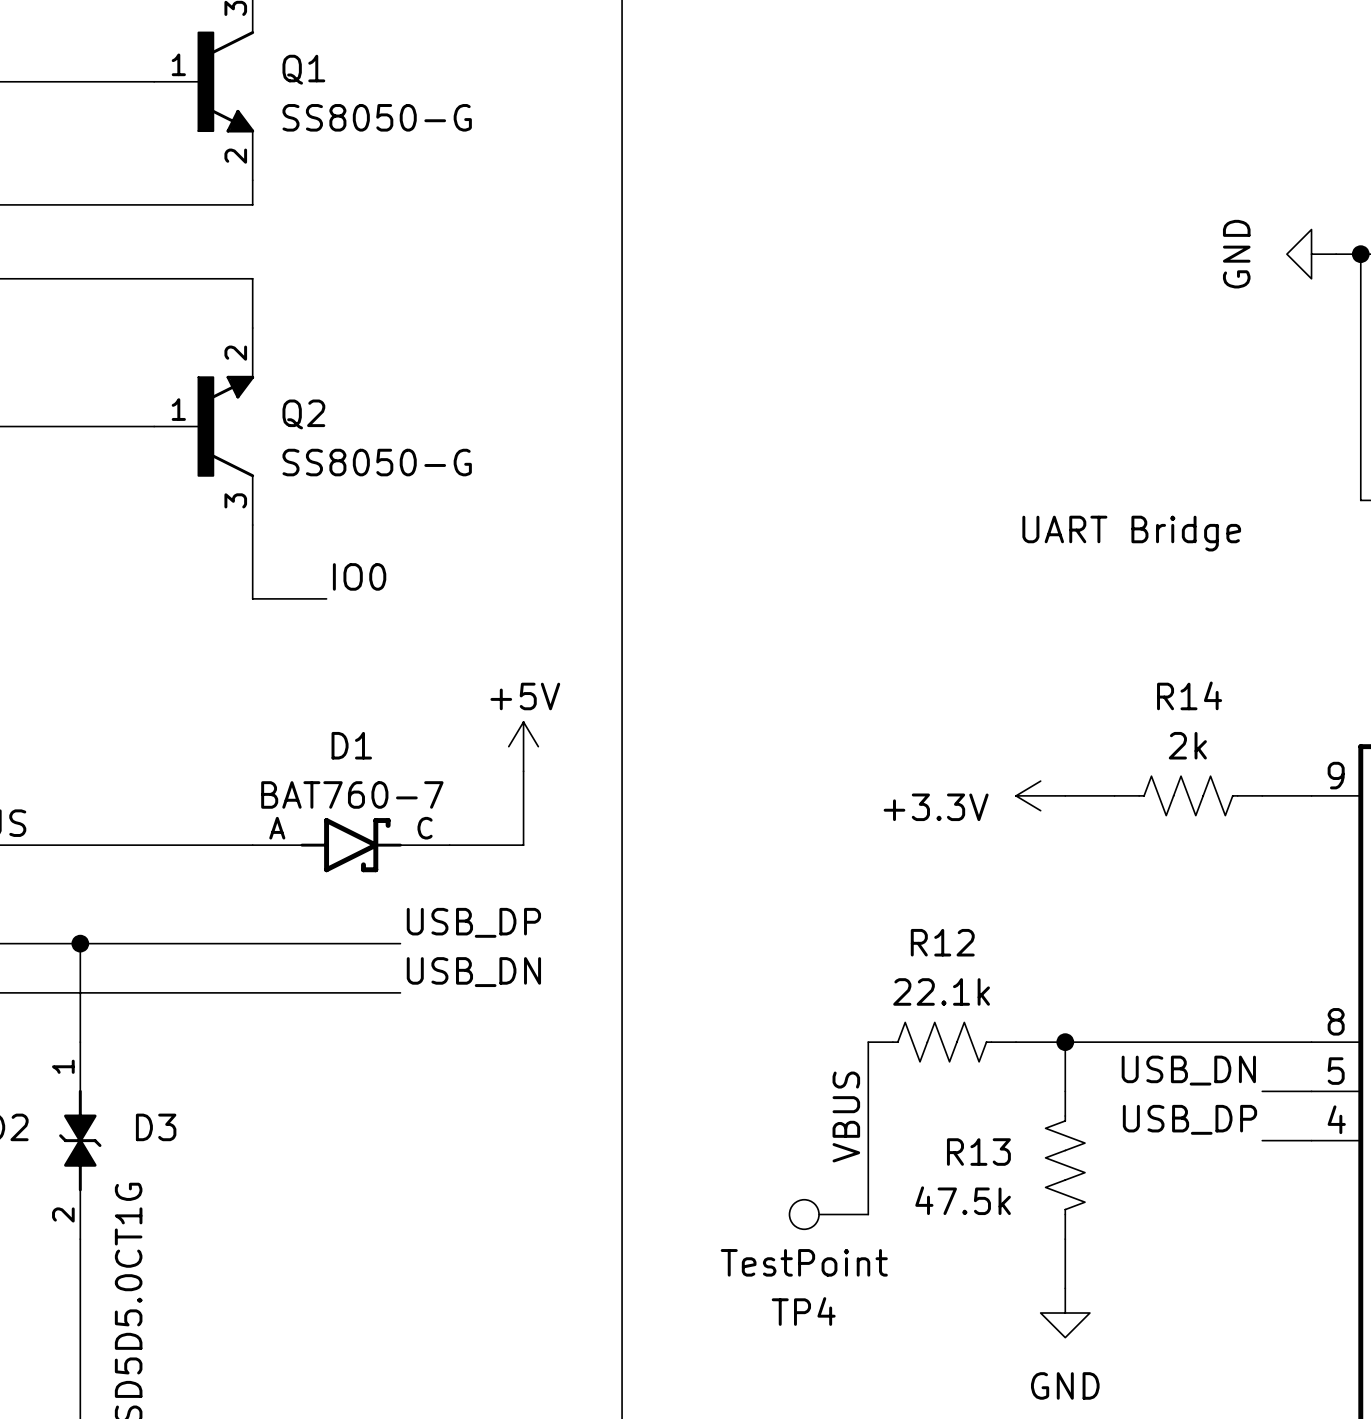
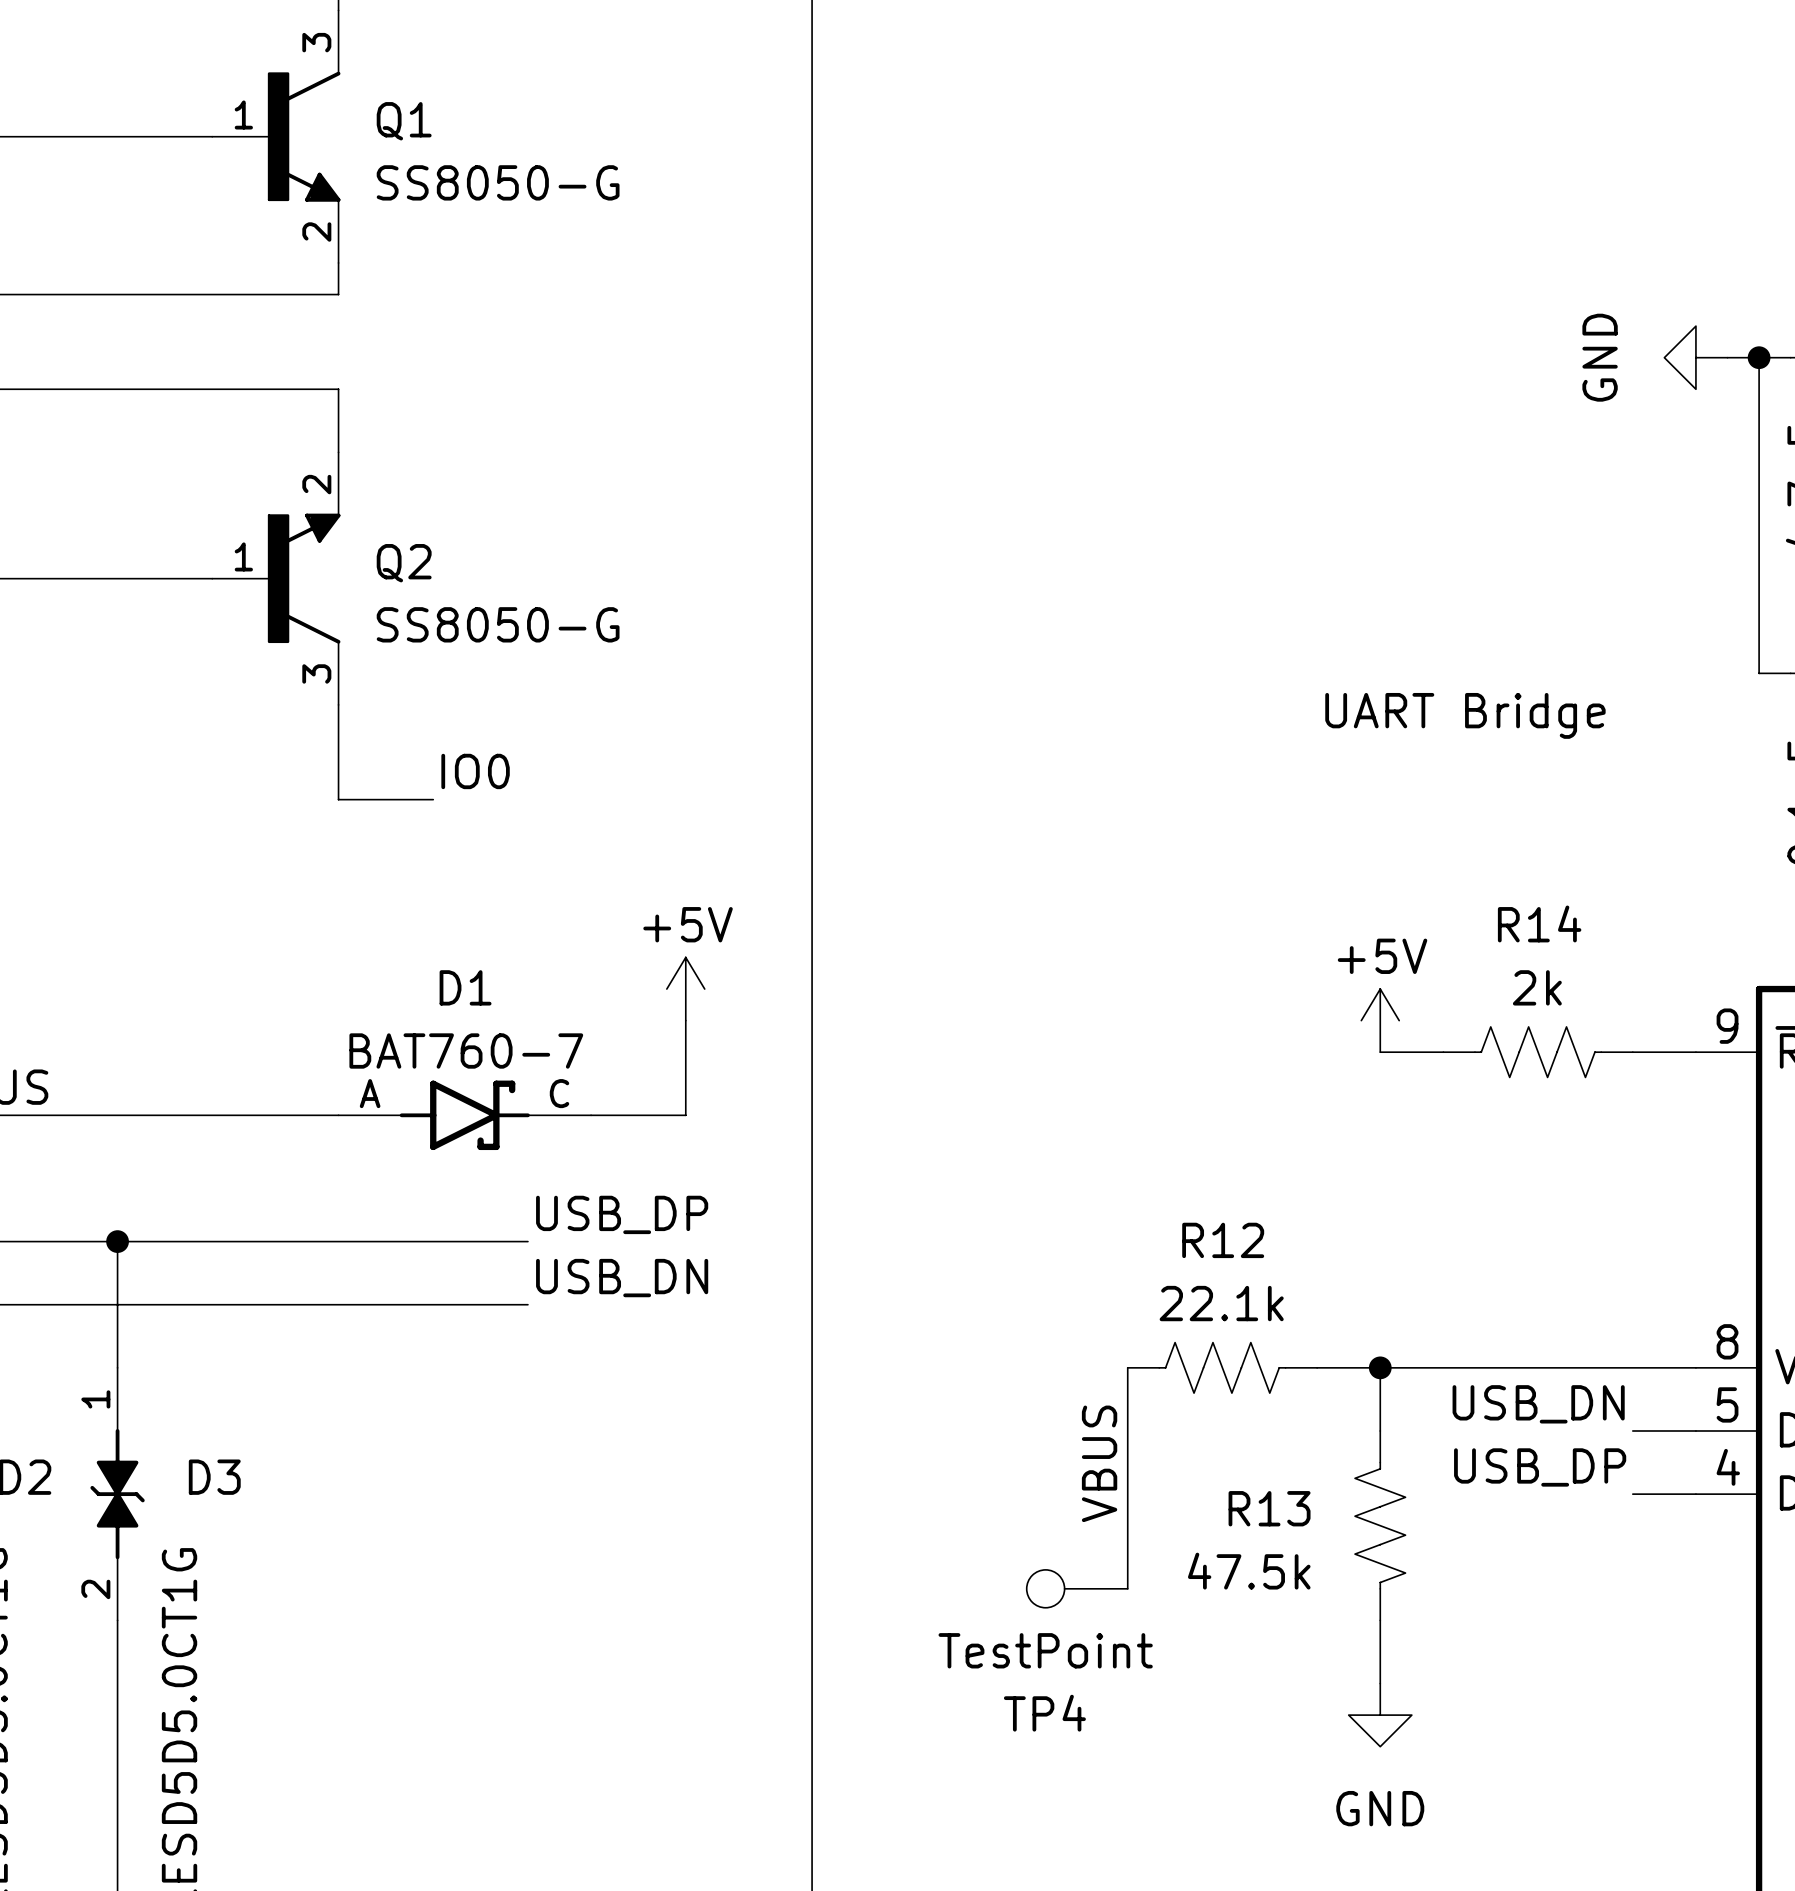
power symbol: none -> +5V (1380, 1020)
power symbol: +3.3V (1040, 795) -> none

